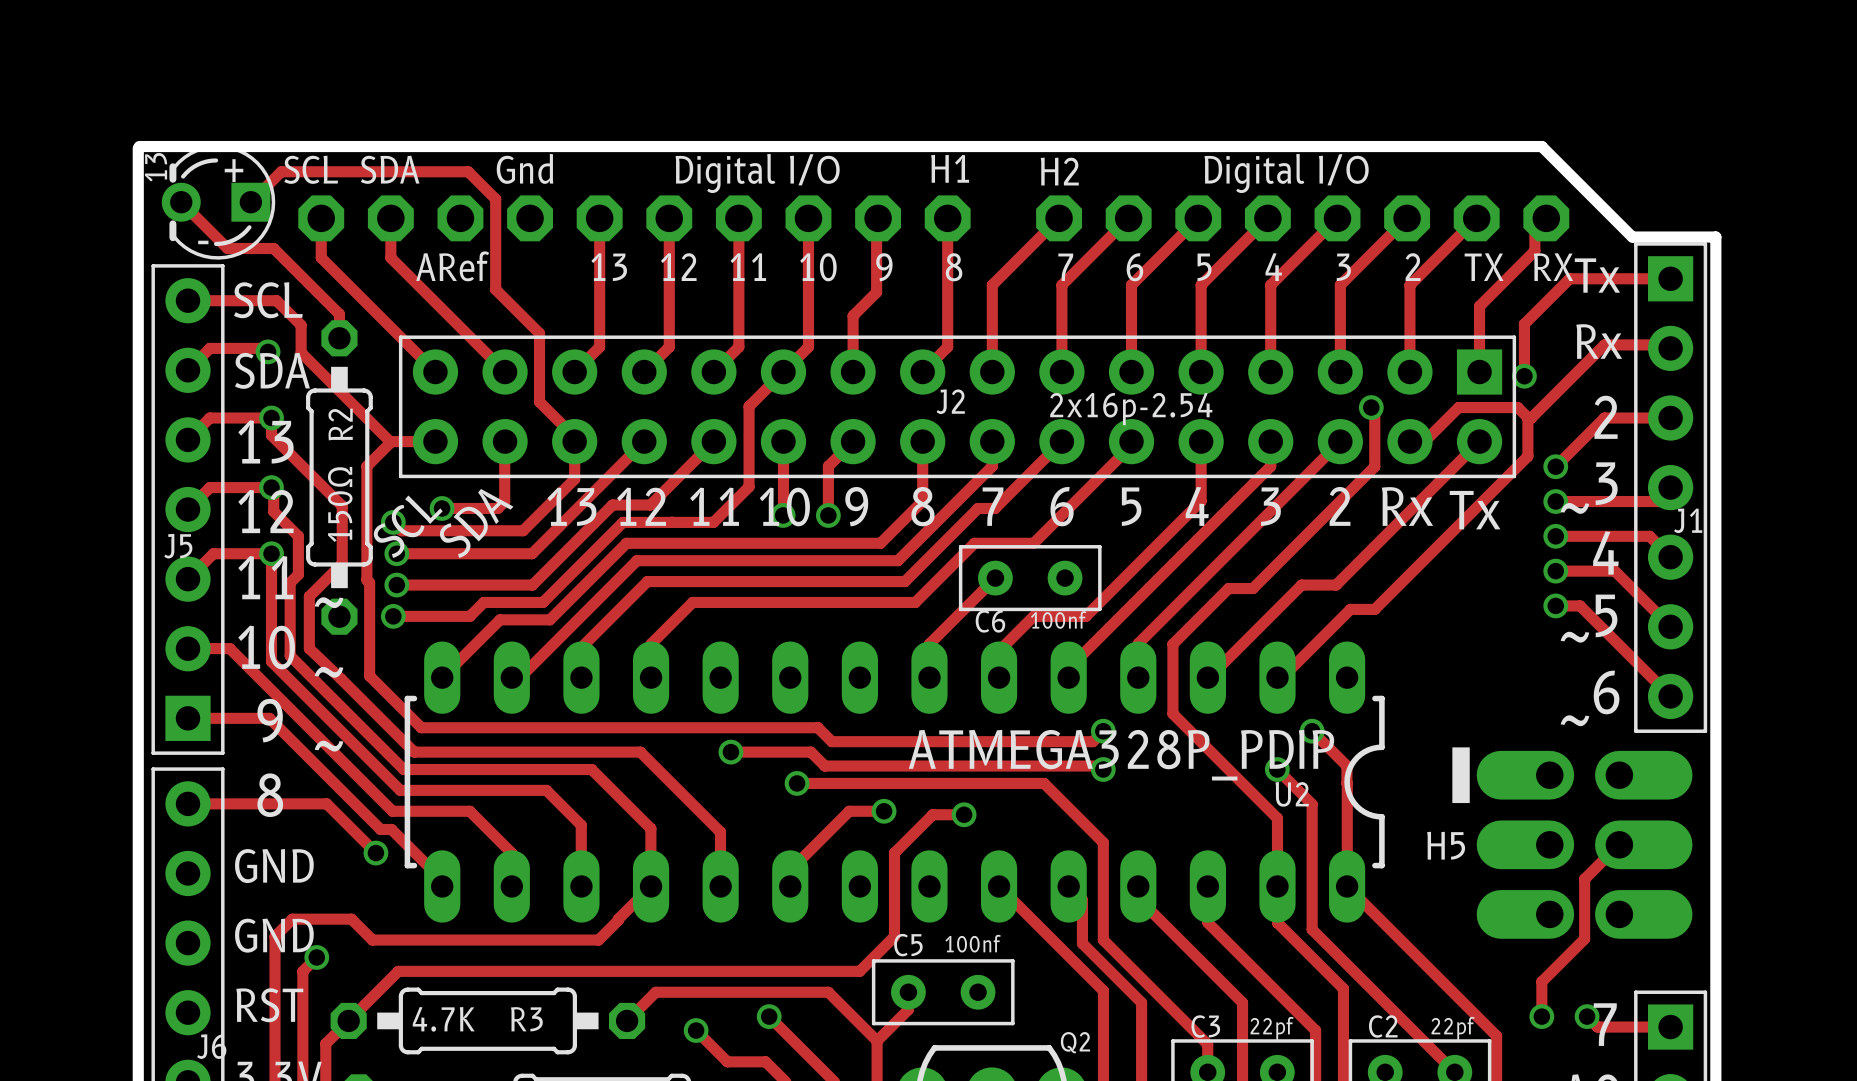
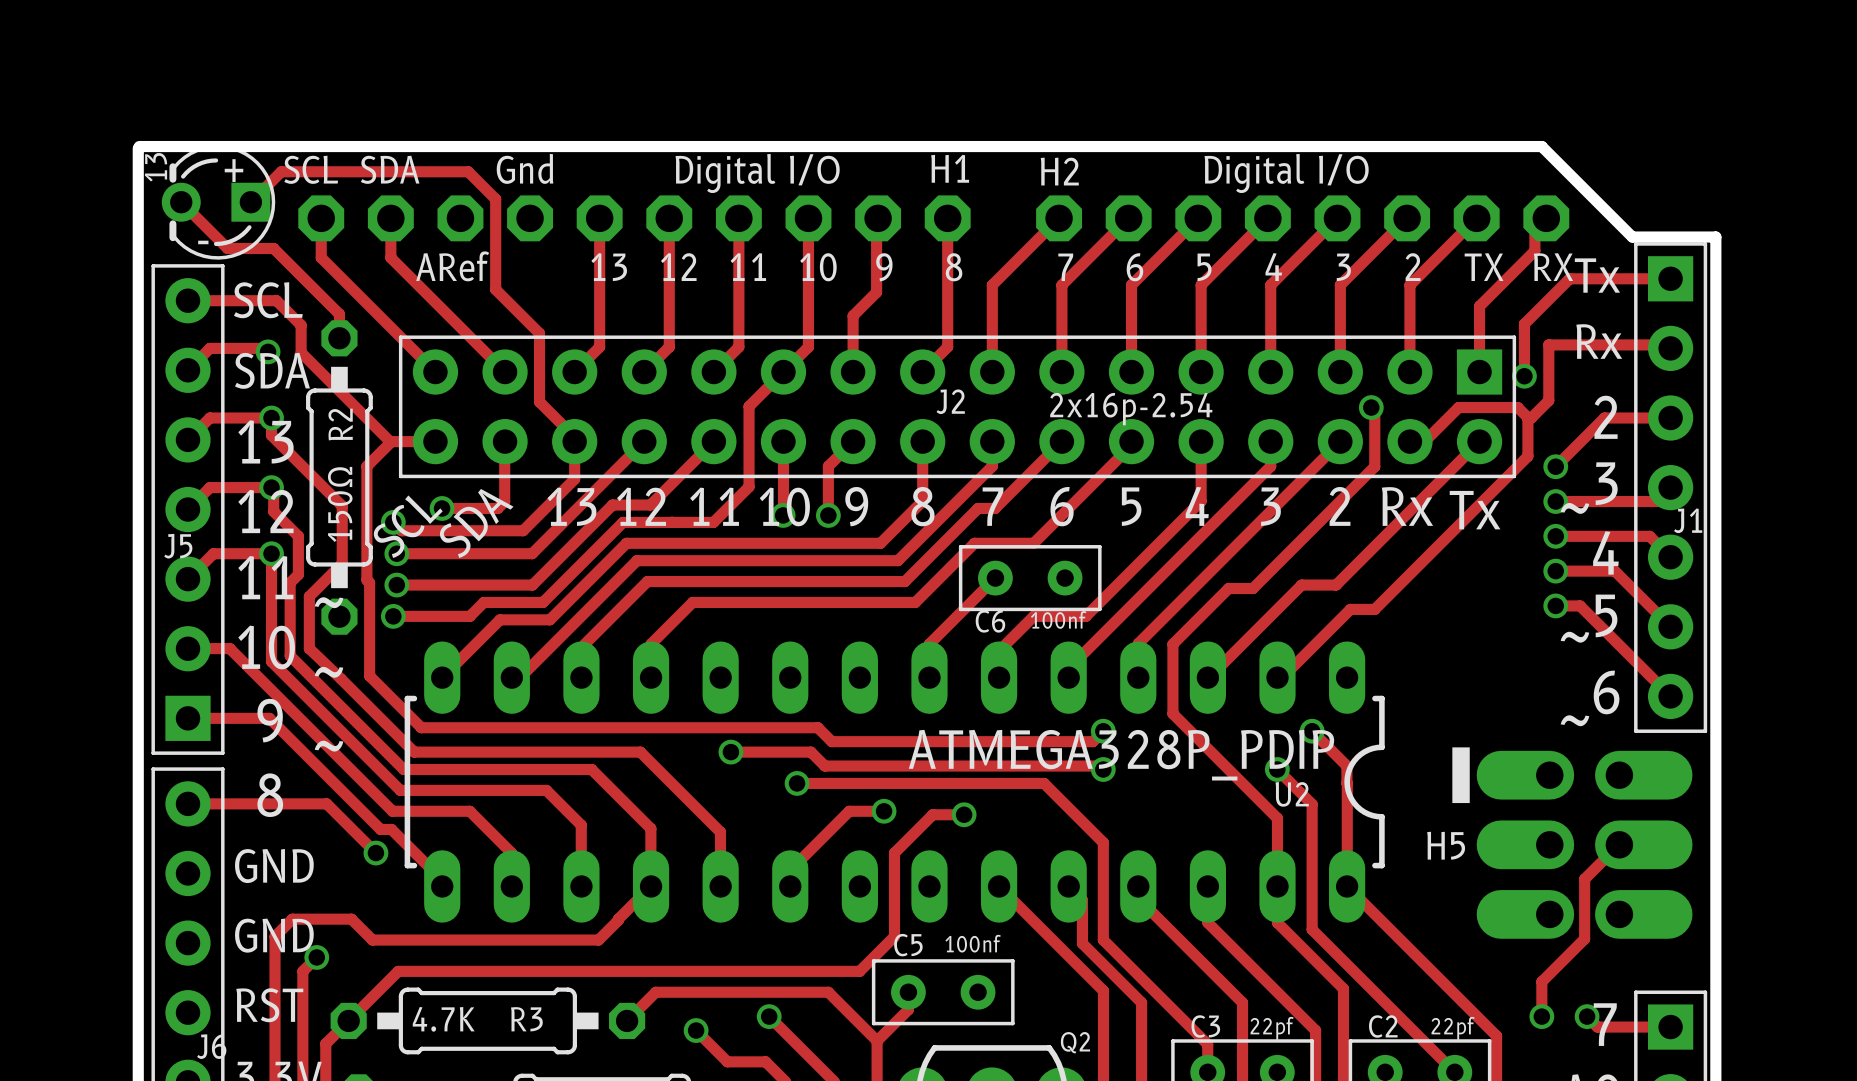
track: (1604, 344) (1548, 400) -> (1604, 344) (1548, 344) (1548, 400)

